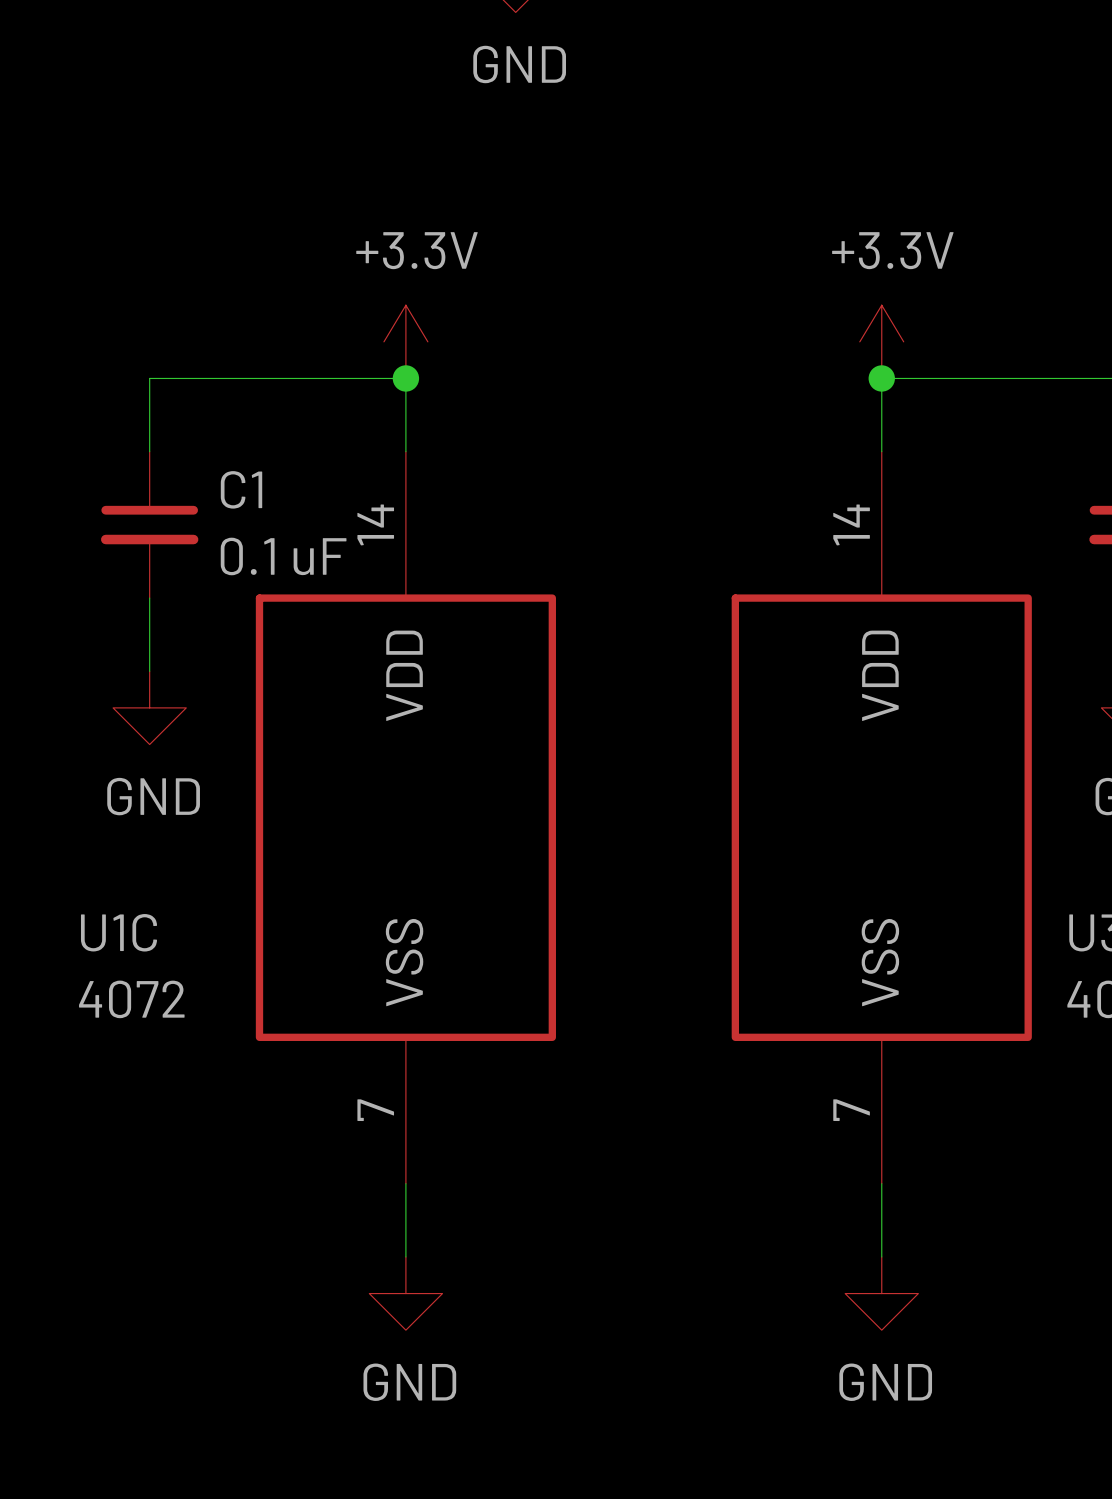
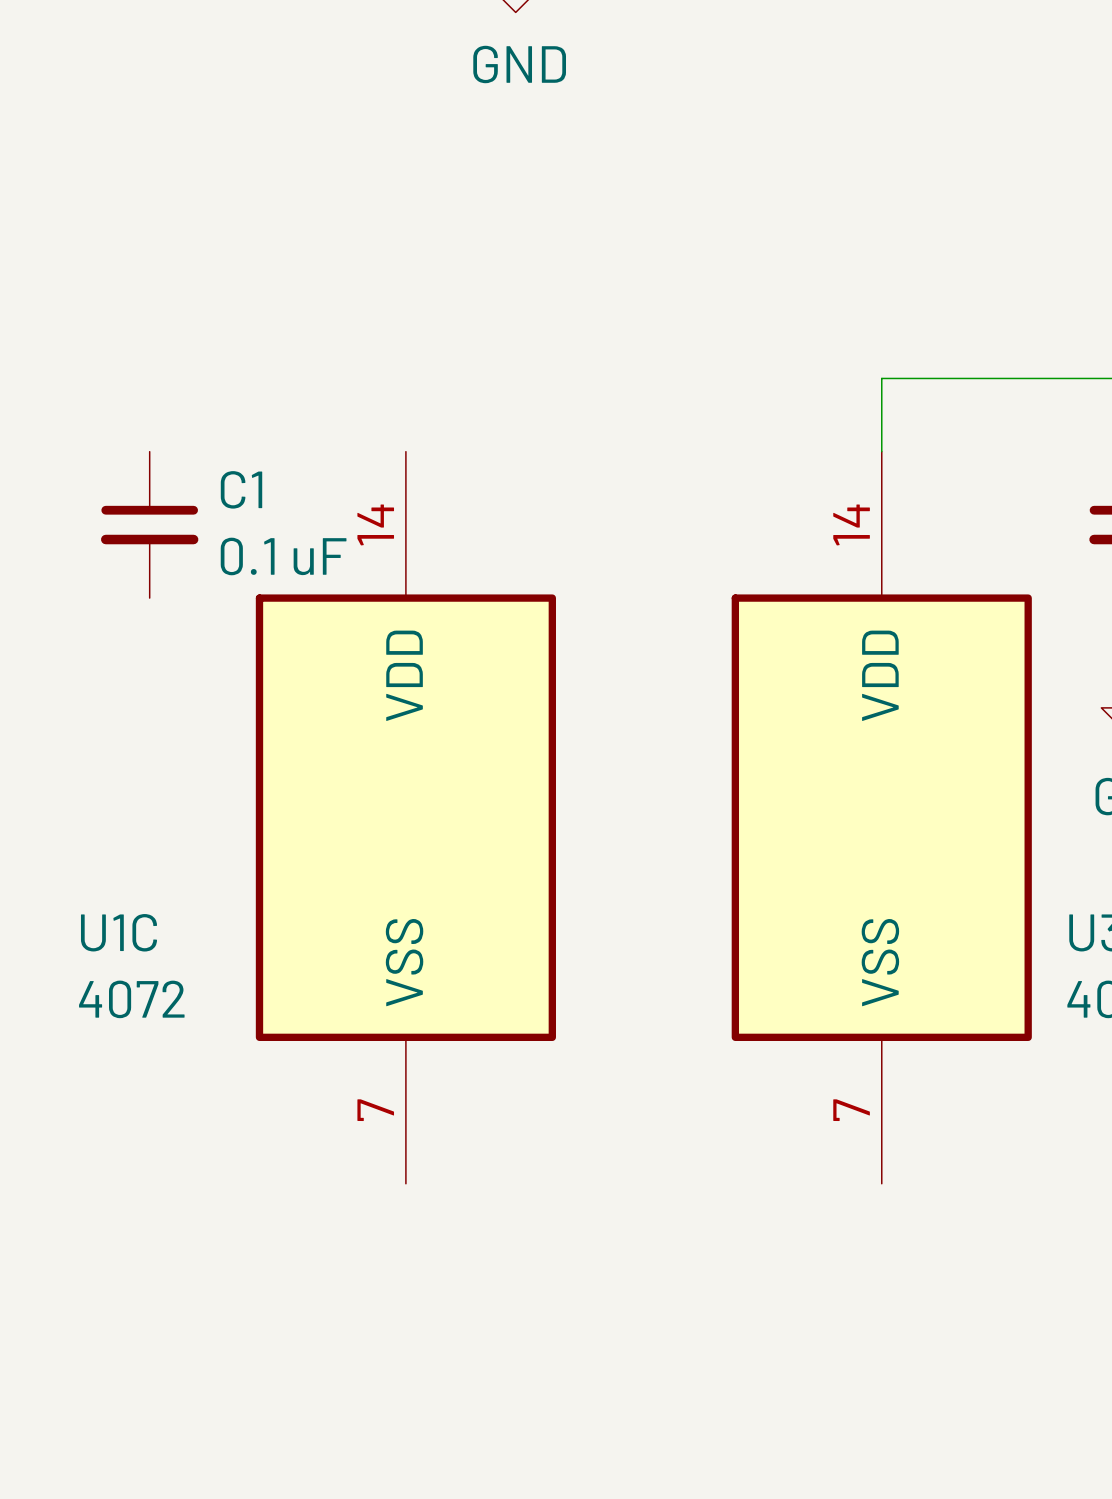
power symbol: +3.3V (405, 341) -> none
power symbol: +3.3V (881, 341) -> none
junction: (405, 378) -> none
junction: (881, 378) -> none
wire: (149, 451) (149, 378) (405, 378) (405, 451) -> none
wire: (149, 598) (149, 671) -> none
power symbol: GND (149, 707) -> none
wire: (405, 1183) (405, 1256) -> none
wire: (881, 1183) (881, 1256) -> none
power symbol: GND (405, 1293) -> none
power symbol: GND (881, 1293) -> none

